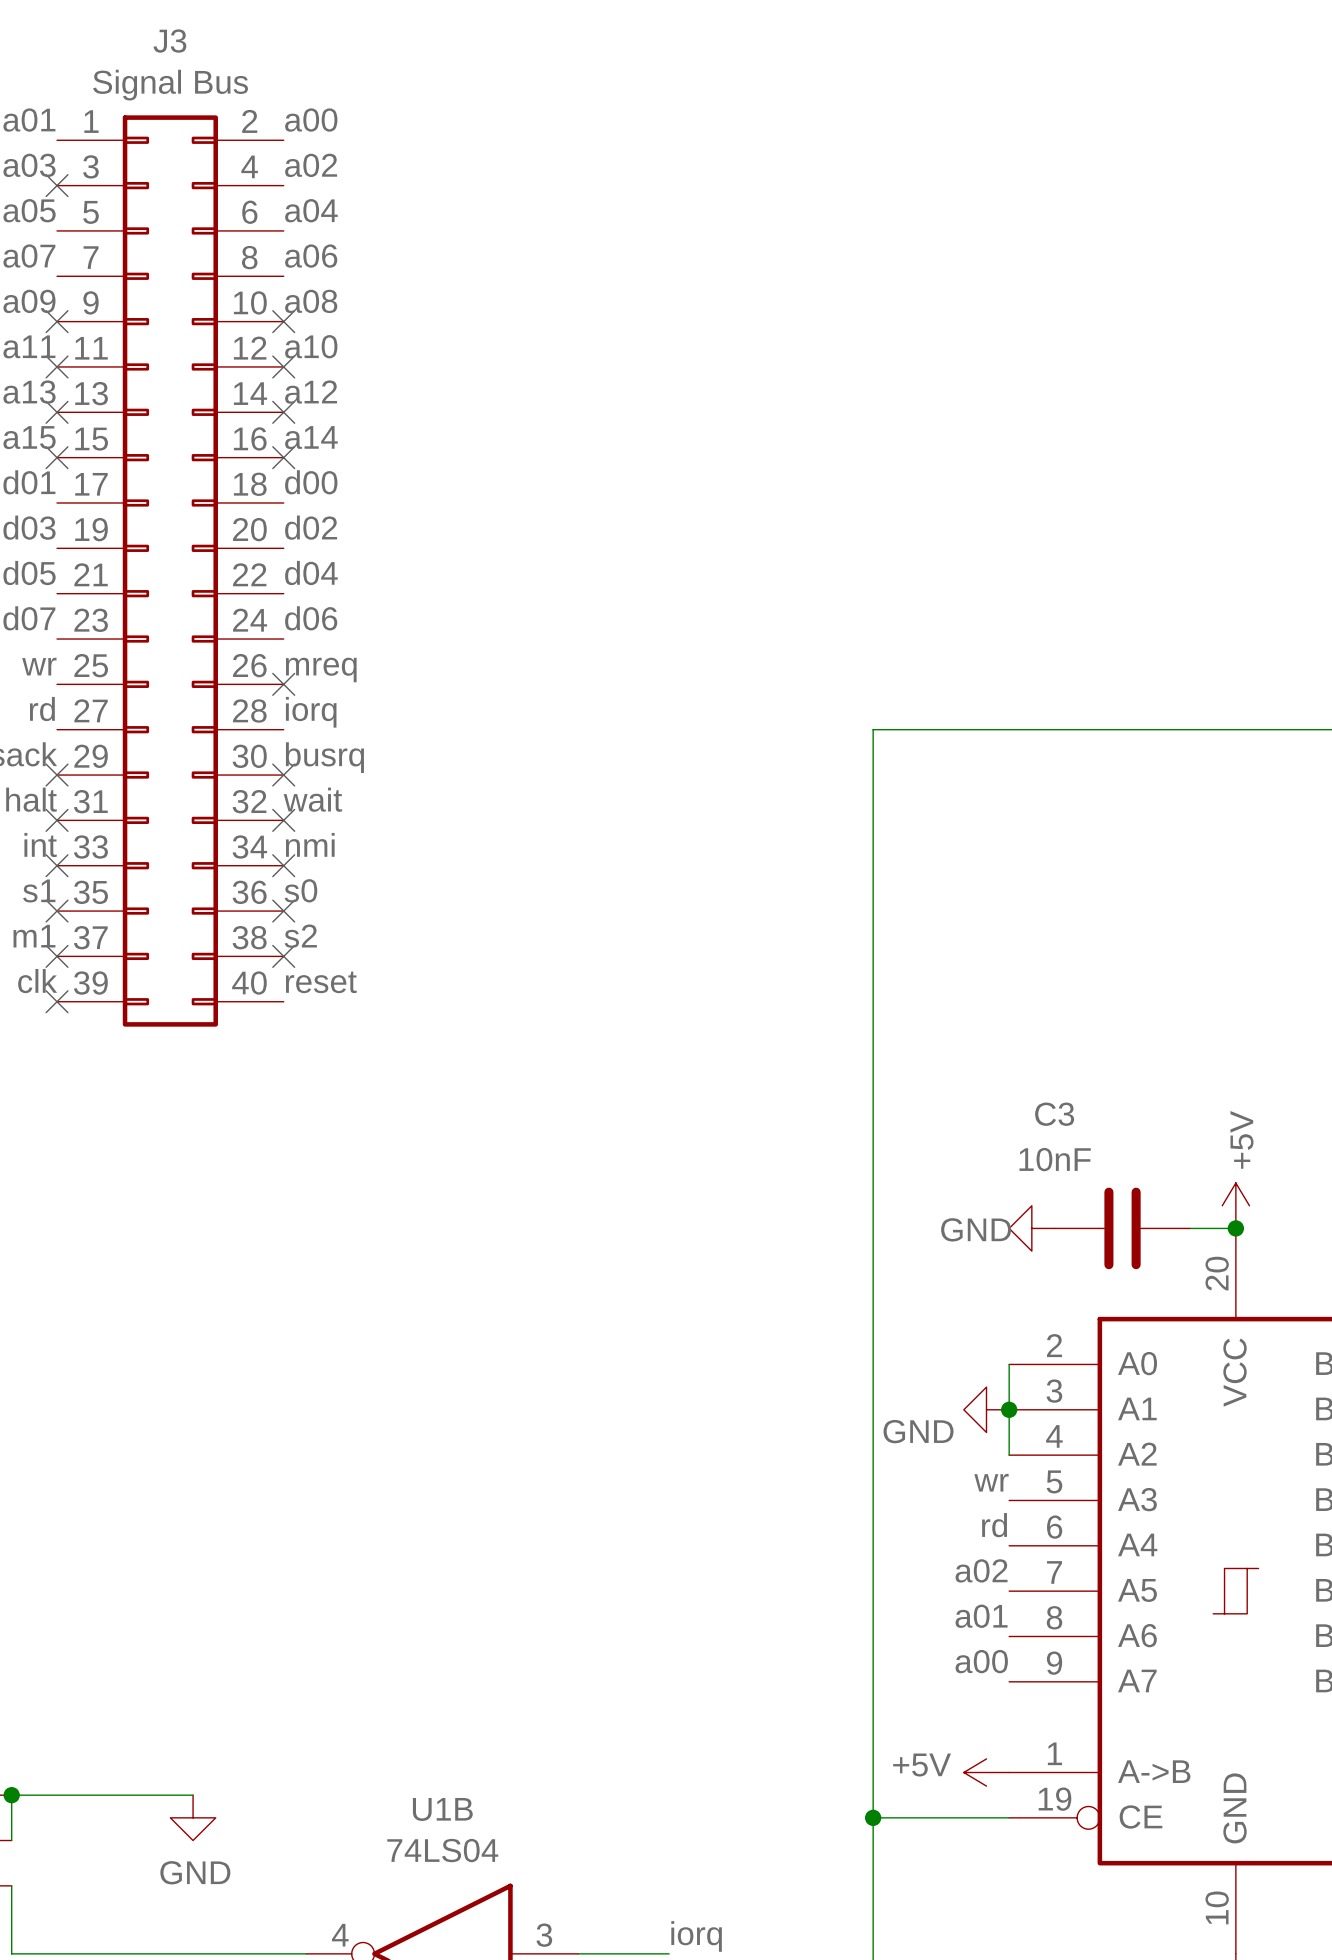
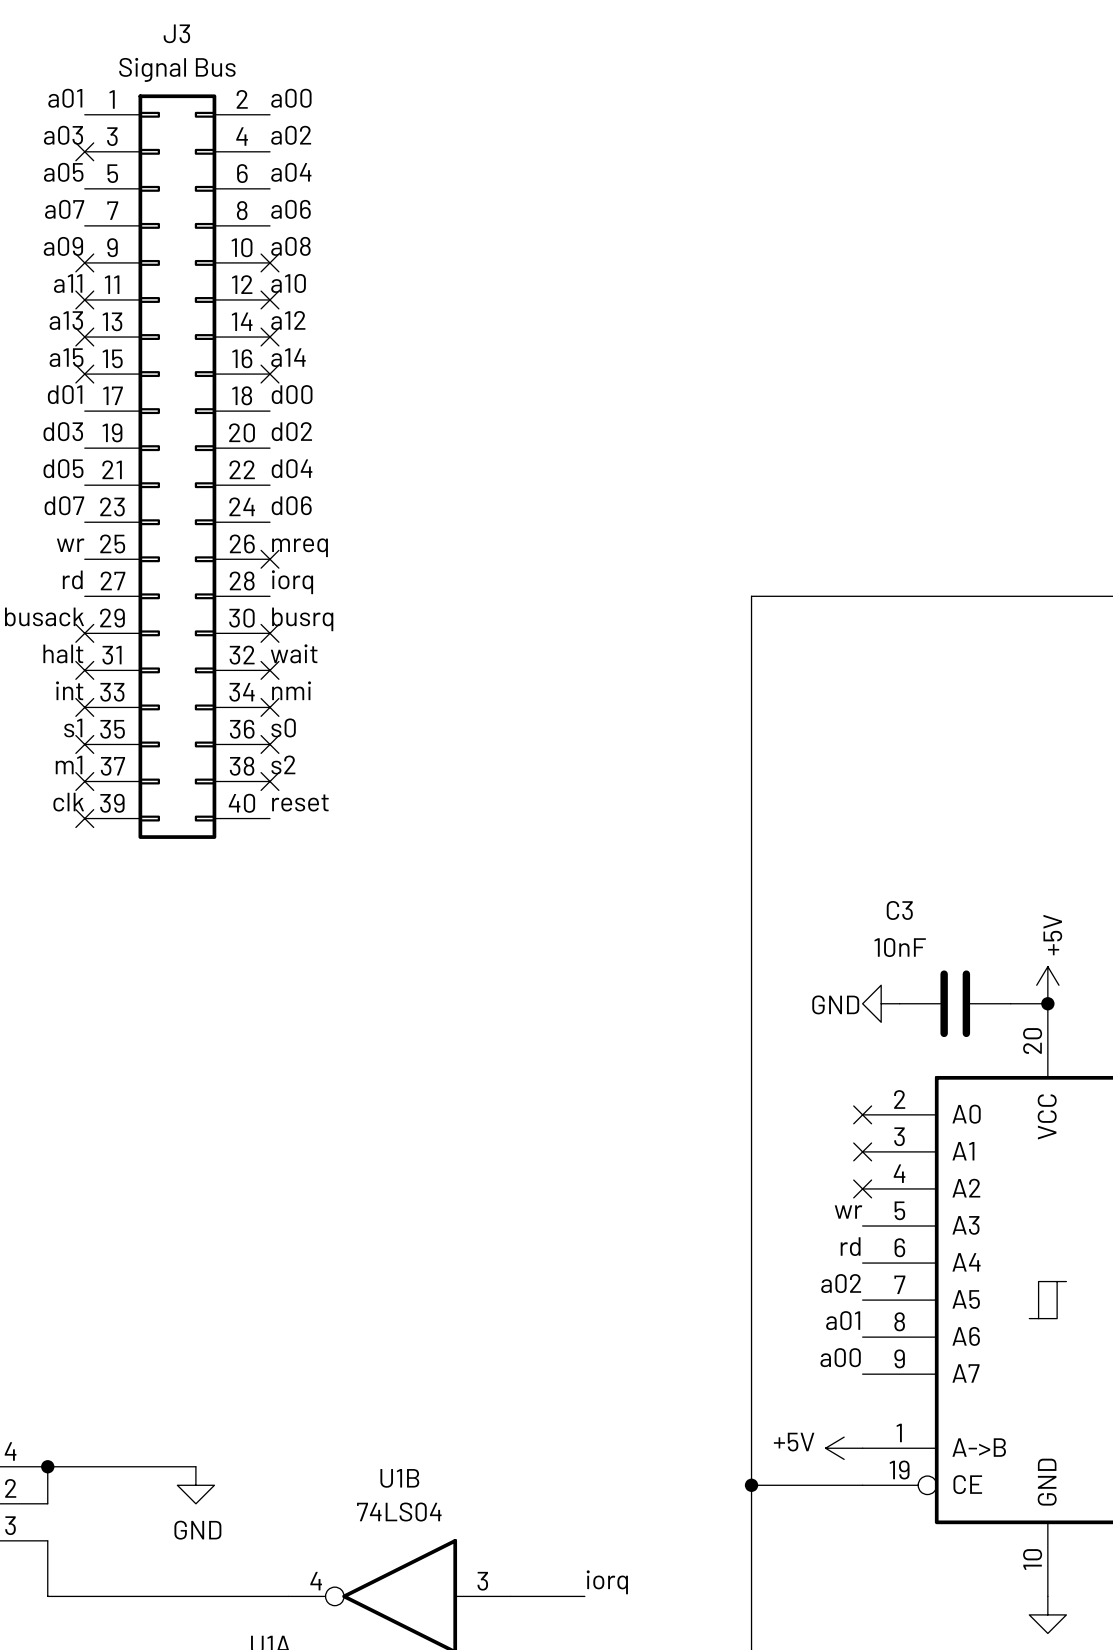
wire: (1009, 1364) (1009, 1455) -> none
no-connect mark: none -> (862, 1114)
power symbol: GND (986, 1409) -> none
junction: (1009, 1409) -> none
no-connect mark: none -> (862, 1151)
no-connect mark: none -> (862, 1188)

